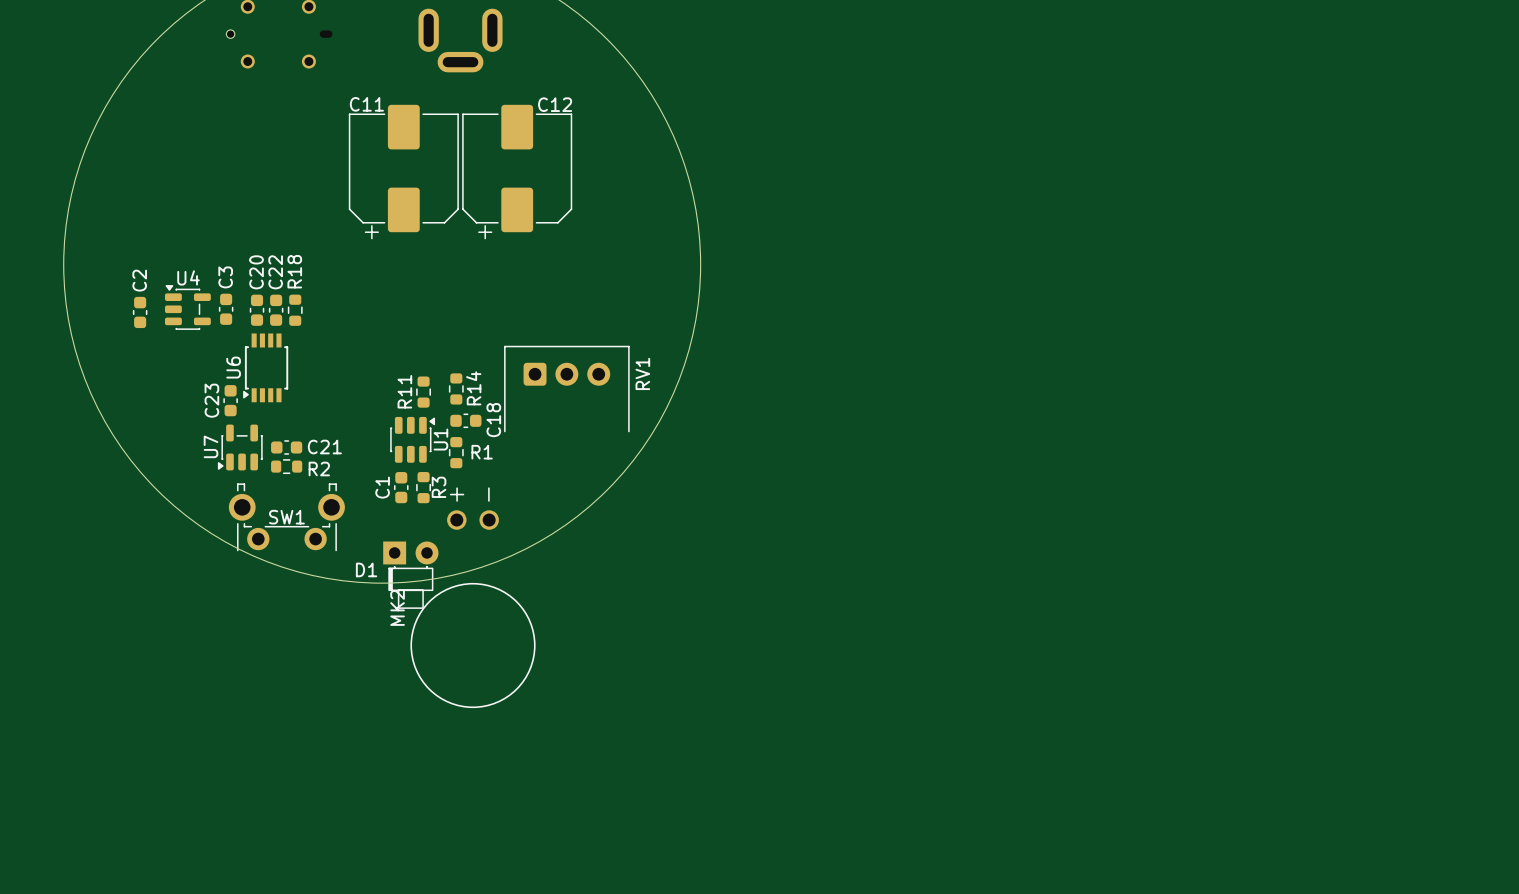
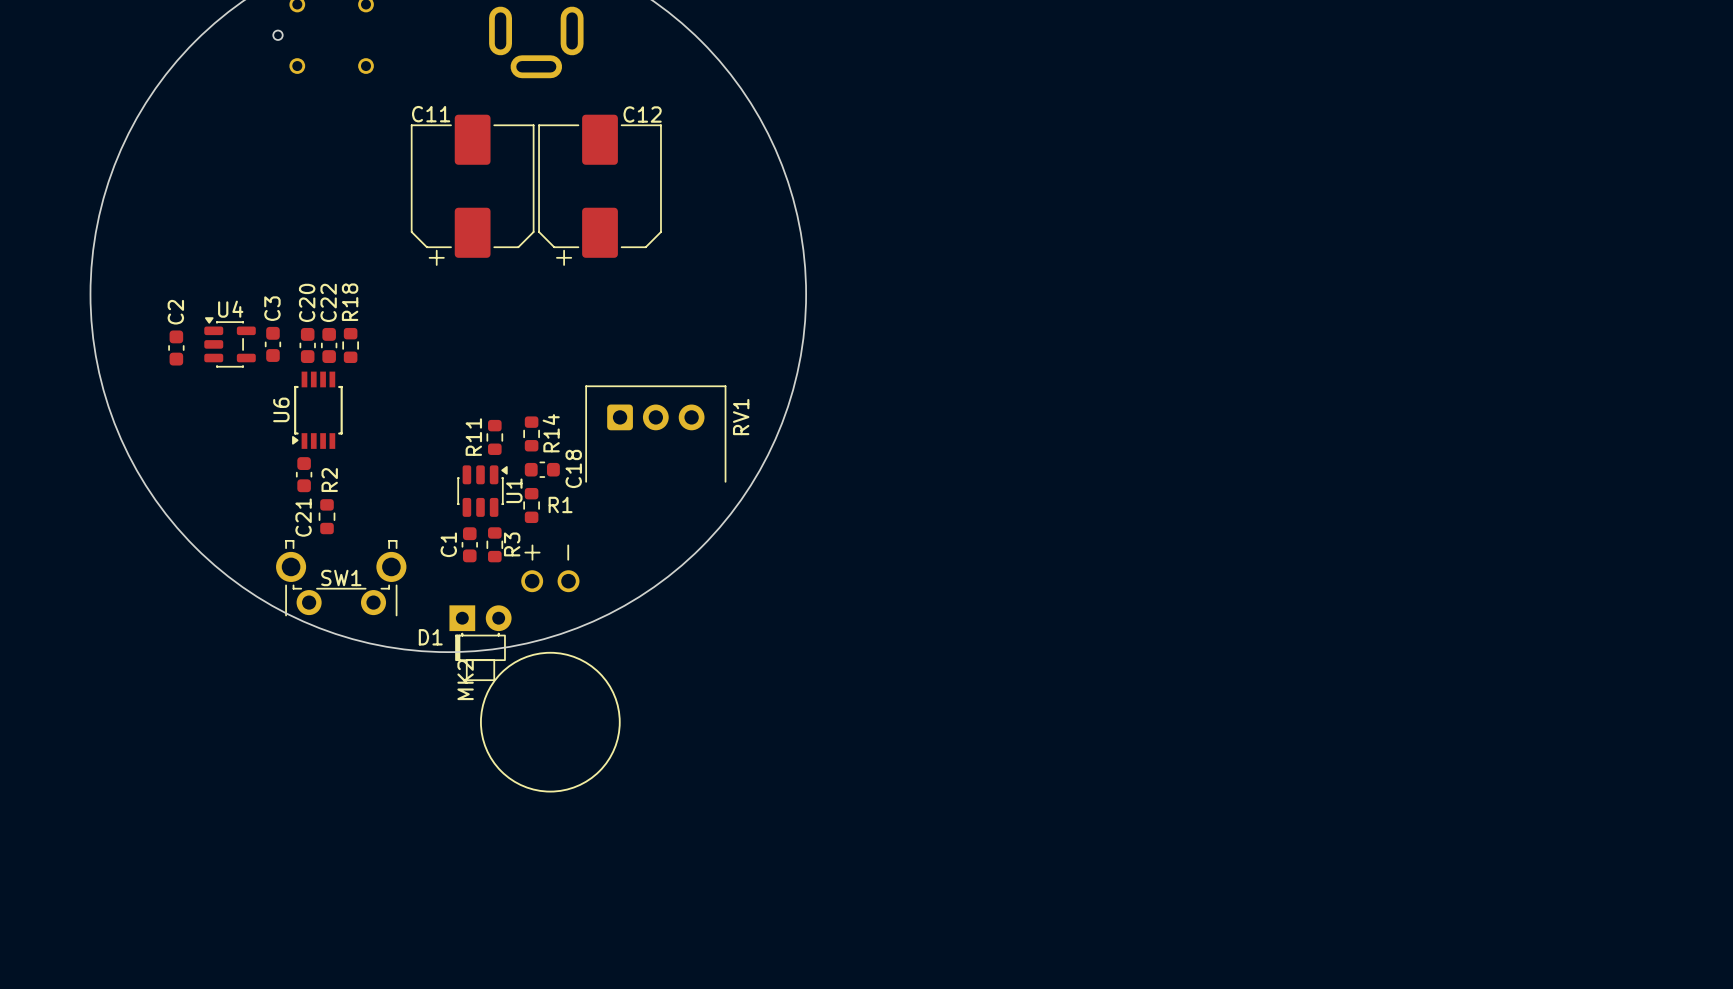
C23: (230, 400) -> none
U7: (240, 447) -> none
C21 rotation: 0° (286, 447) -> 90° clockwise (304, 474)
C21 position: (286, 447) -> (304, 474)
R2 rotation: 0° (286, 466) -> 90° clockwise (327, 516)
R2 name position: R2 (319, 468) -> R2 (329, 480)

